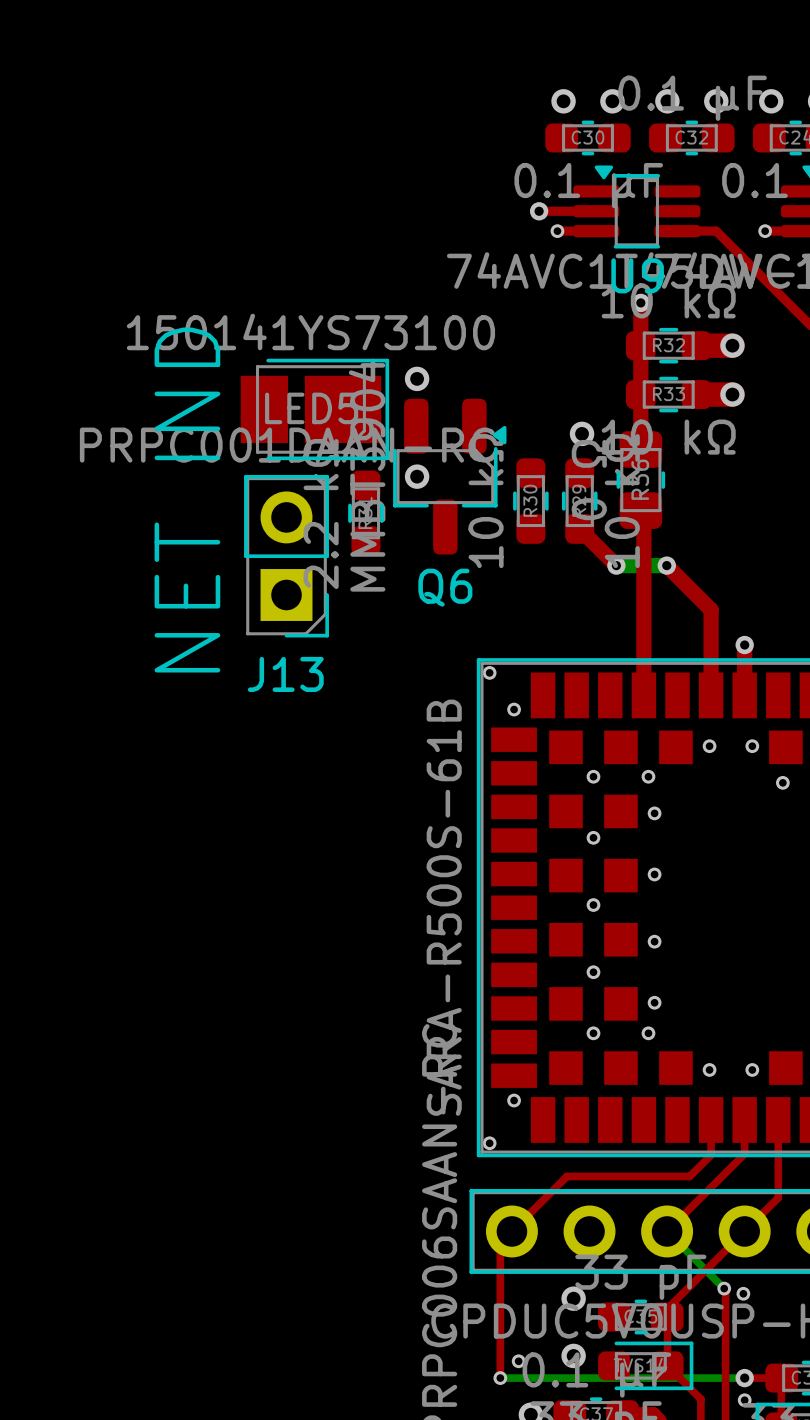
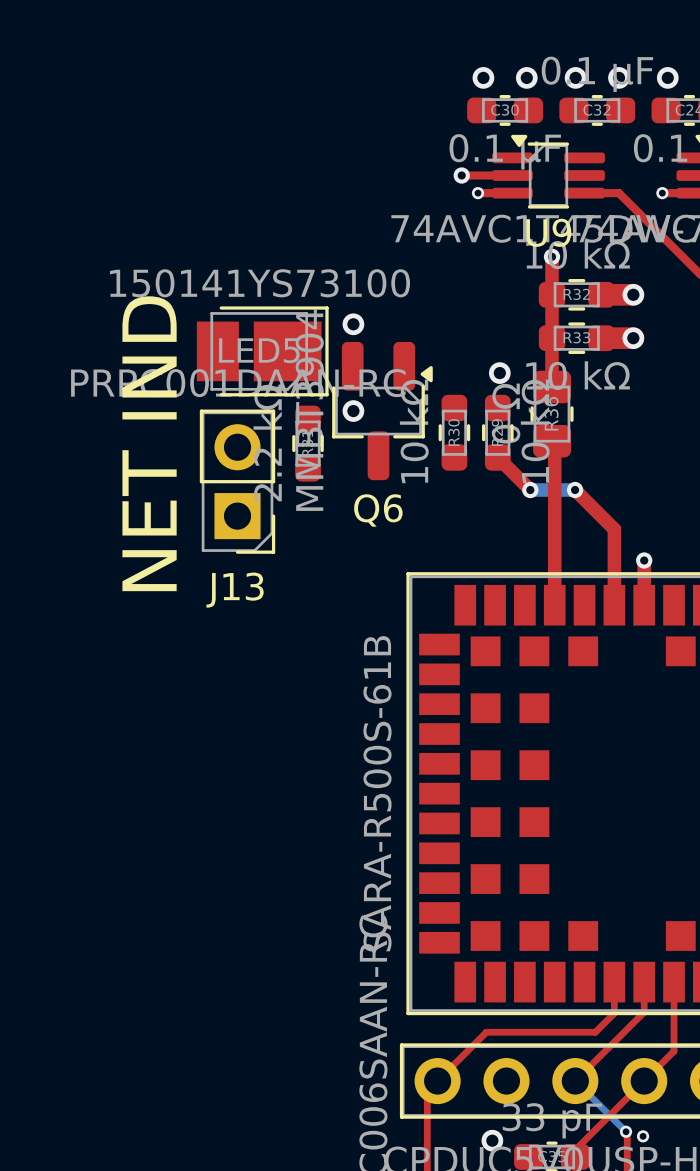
via: (489, 672) -> none
via: (514, 709) -> none
via: (709, 746) -> none
via: (752, 746) -> none
via: (593, 776) -> none
via: (648, 776) -> none
via: (782, 782) -> none
via: (654, 813) -> none
via: (593, 837) -> none
via: (654, 874) -> none
via: (593, 905) -> none
via: (654, 941) -> none
via: (593, 972) -> none
via: (654, 1002) -> none
via: (593, 1033) -> none
via: (648, 1033) -> none
via: (709, 1069) -> none
via: (752, 1069) -> none
via: (514, 1100) -> none
via: (489, 1143) -> none

